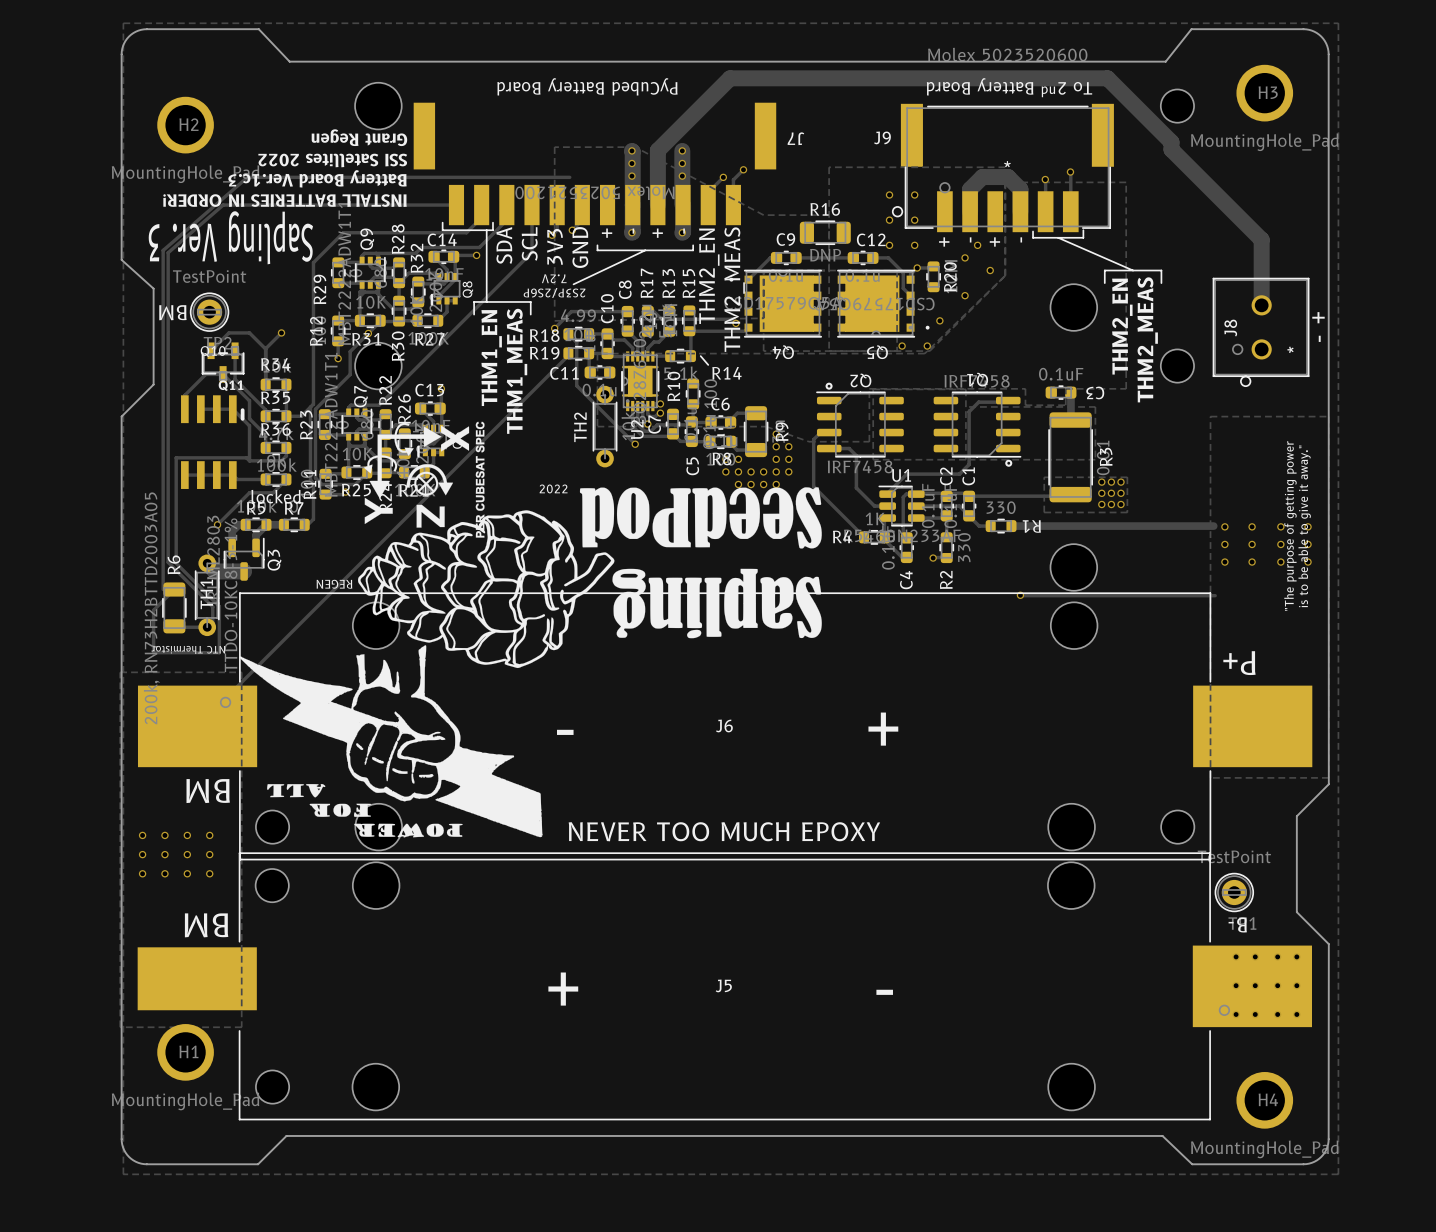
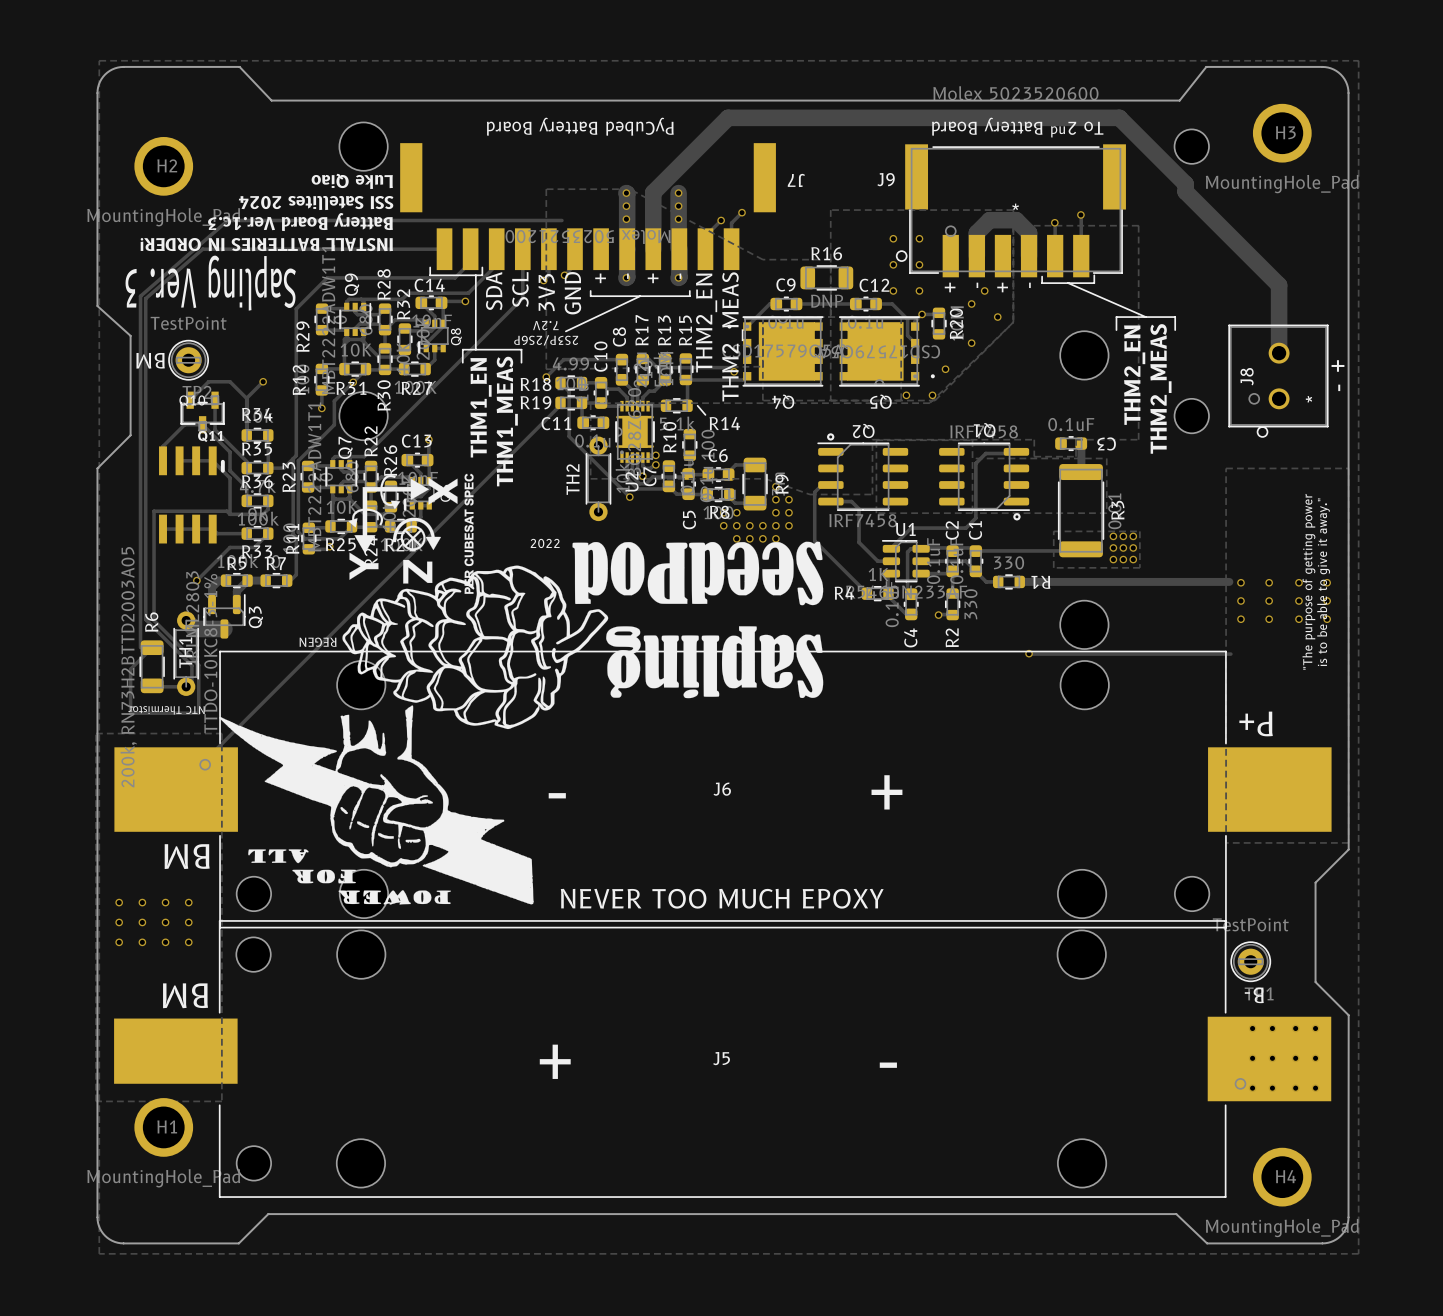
text: Grant Regen (359, 137) -> Luke Qiao (352, 181)
text: SSI Satellites 2022 (332, 160) -> SSI Satellites 2024 (316, 203)
locked name: locked (276, 496) -> R33 (257, 551)

